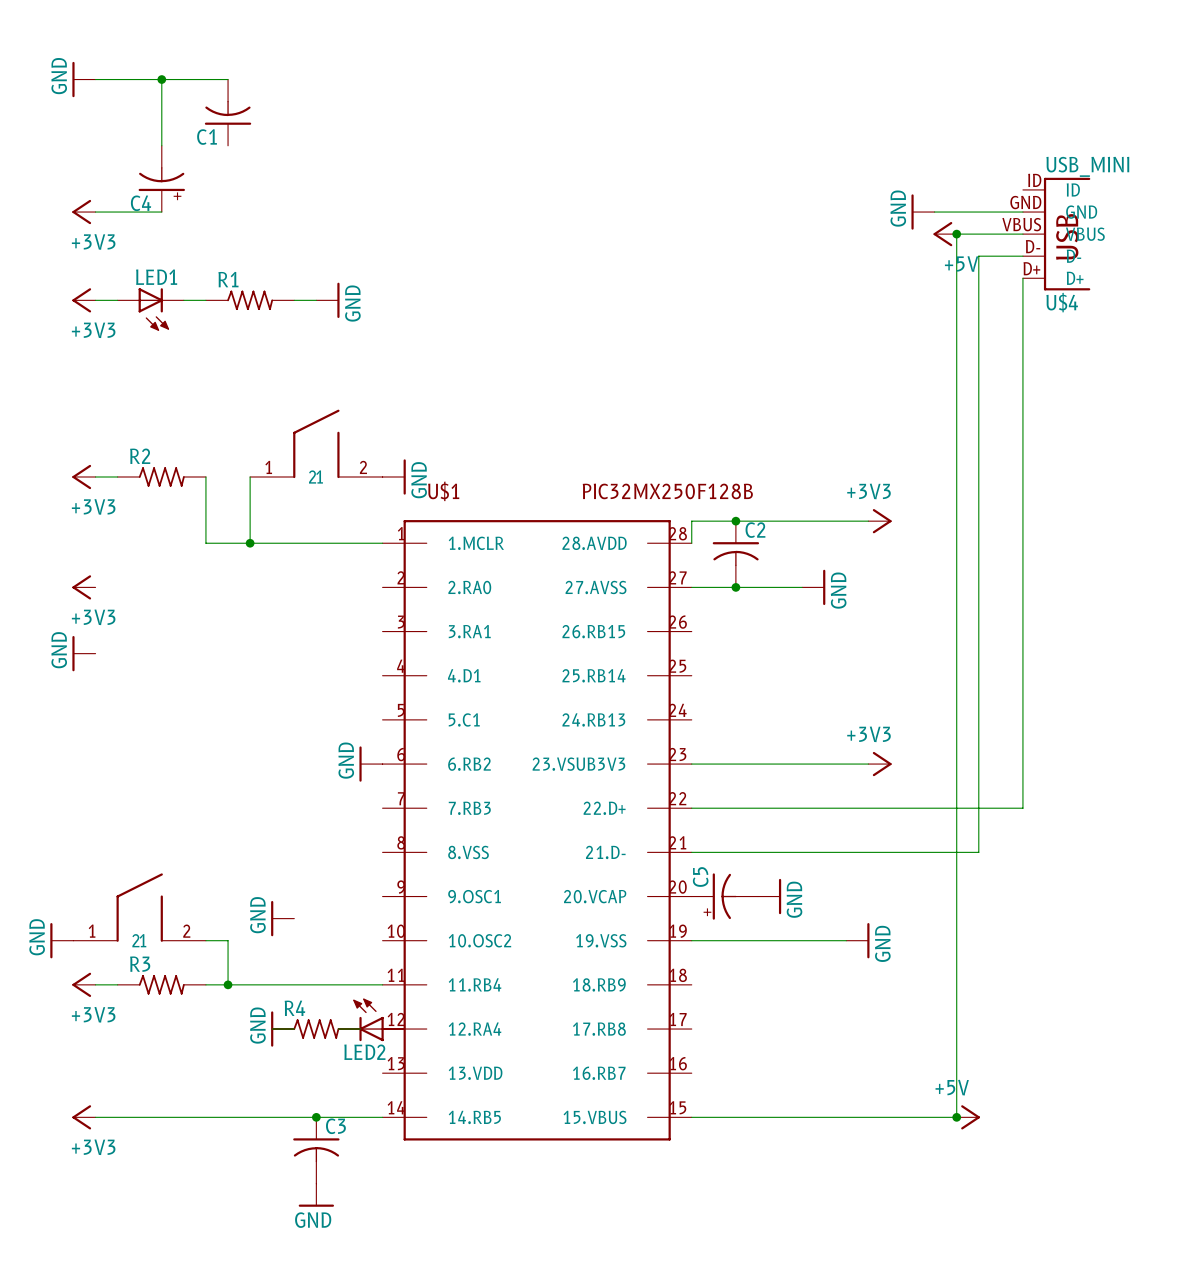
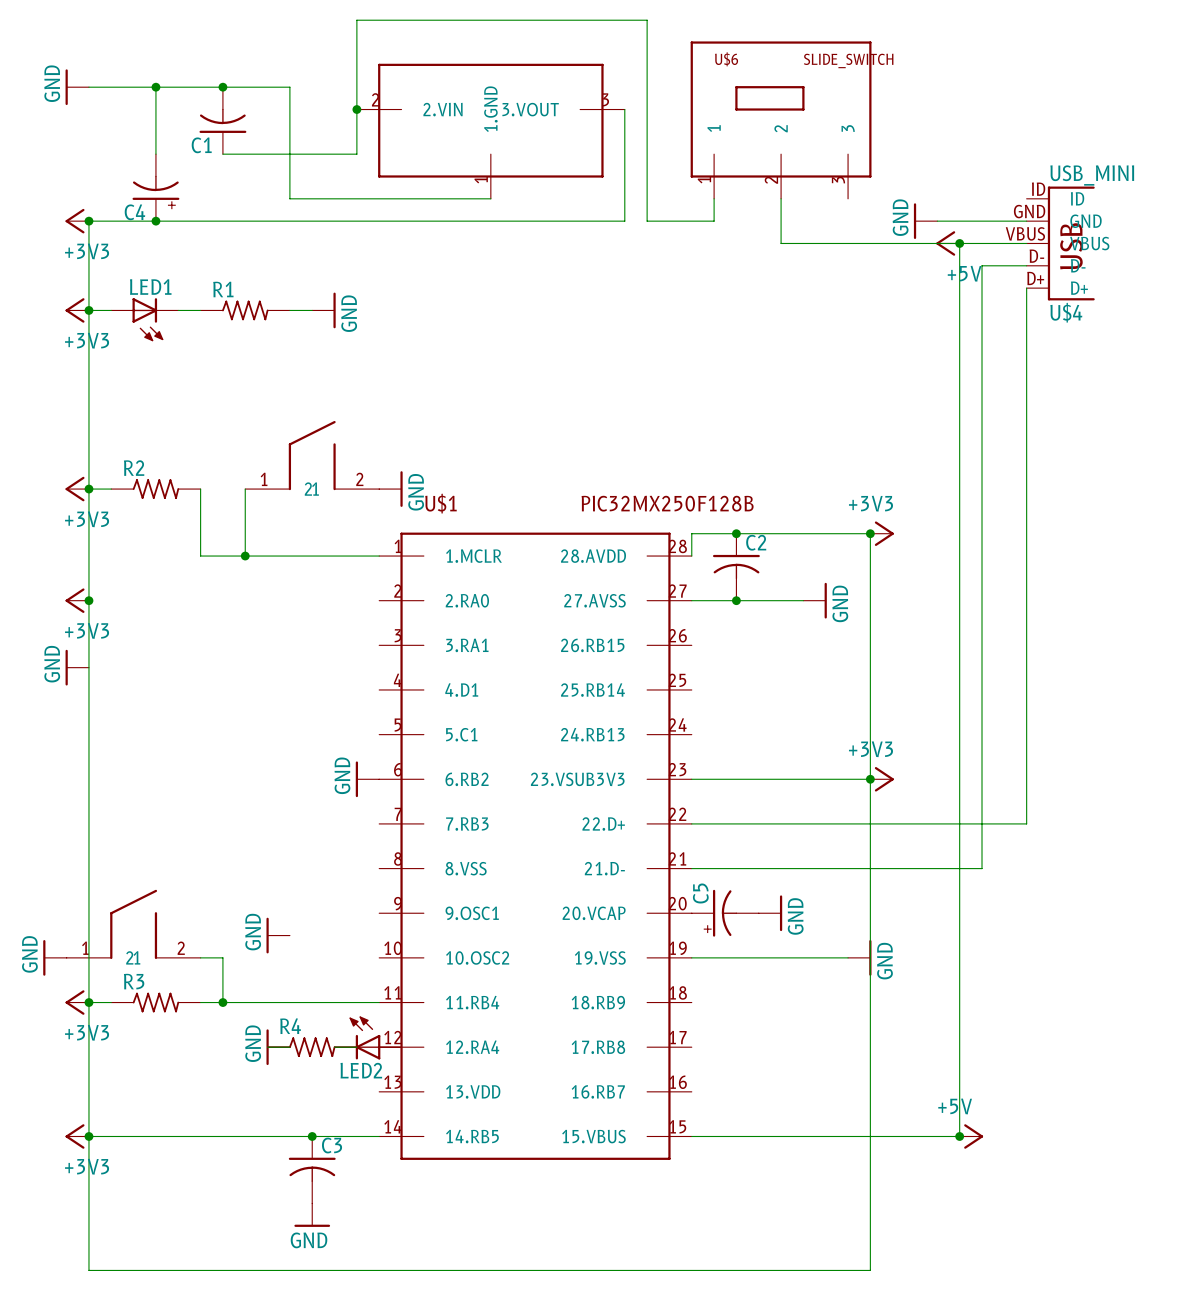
wire: none -> (222, 87) (289, 87) (289, 198) (490, 198)
junction: none -> (222, 87)
junction: none -> (356, 109)
wire: none -> (624, 109) (624, 221) (155, 221)
U$6: none -> SLIDE_SWITCH (781, 120)
part: none -> (490, 131)
wire: none -> (222, 154) (356, 154) (356, 20) (647, 20) (647, 221) (714, 221) (714, 198)
wire: none -> (781, 198) (781, 243) (959, 243)
wire: none -> (88, 221) (88, 1270) (870, 1270) (870, 533)
junction: none -> (88, 221)
junction: none -> (155, 221)
junction: none -> (88, 310)
junction: none -> (88, 489)
junction: none -> (870, 533)
junction: none -> (88, 600)
junction: none -> (870, 779)
junction: none -> (88, 1002)
junction: none -> (88, 1136)

